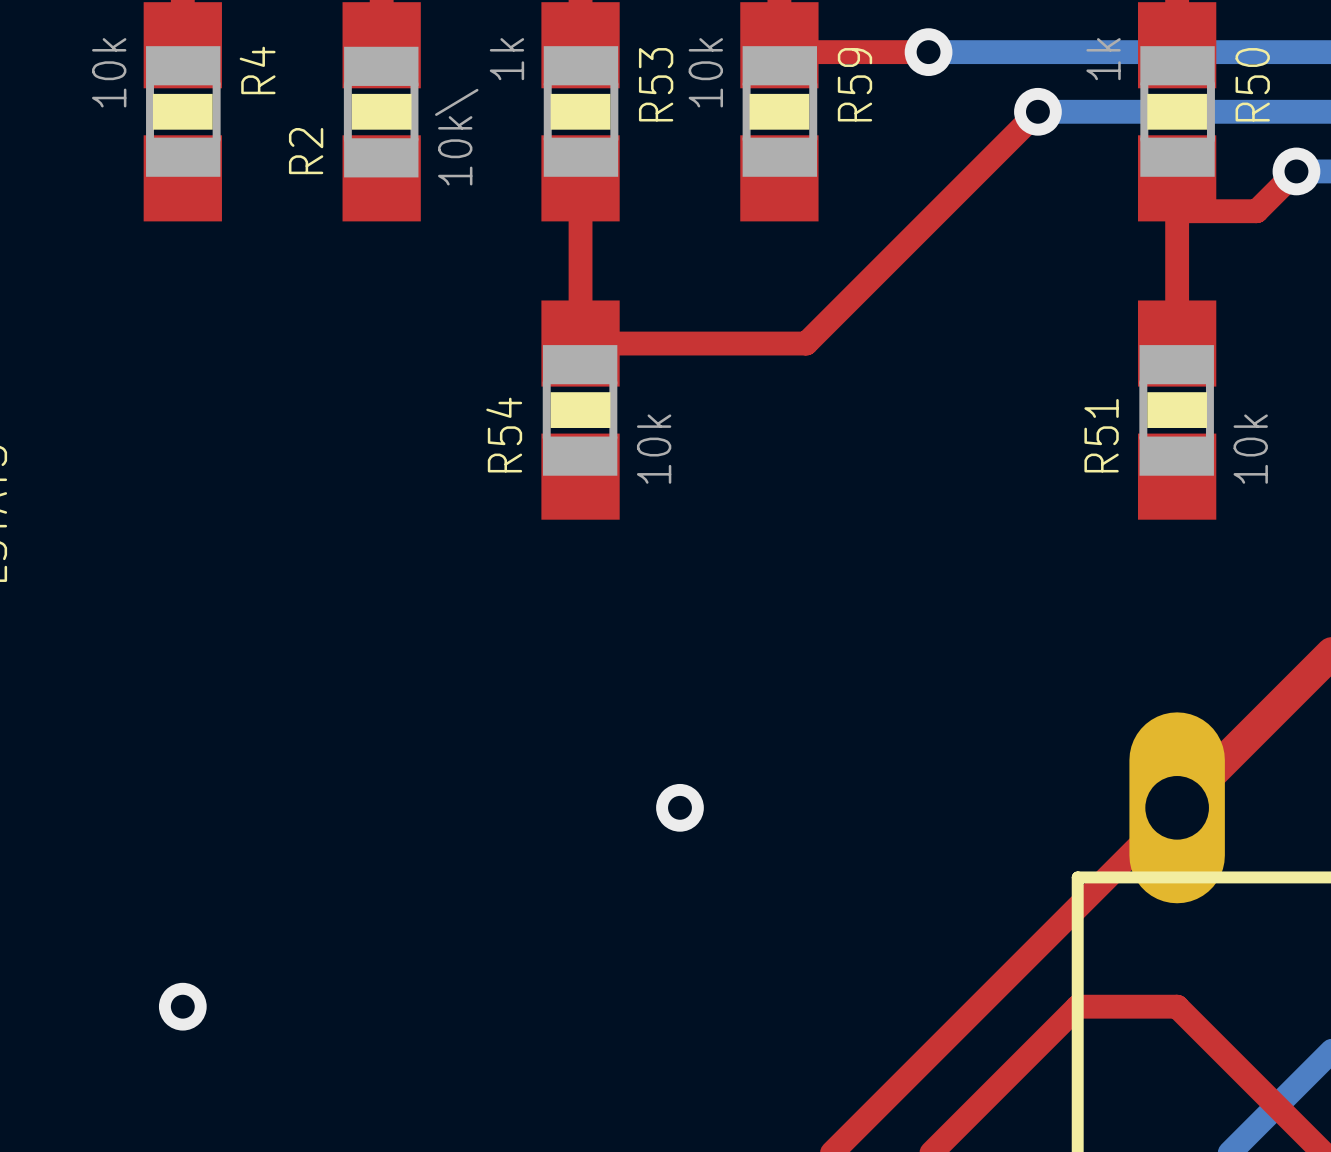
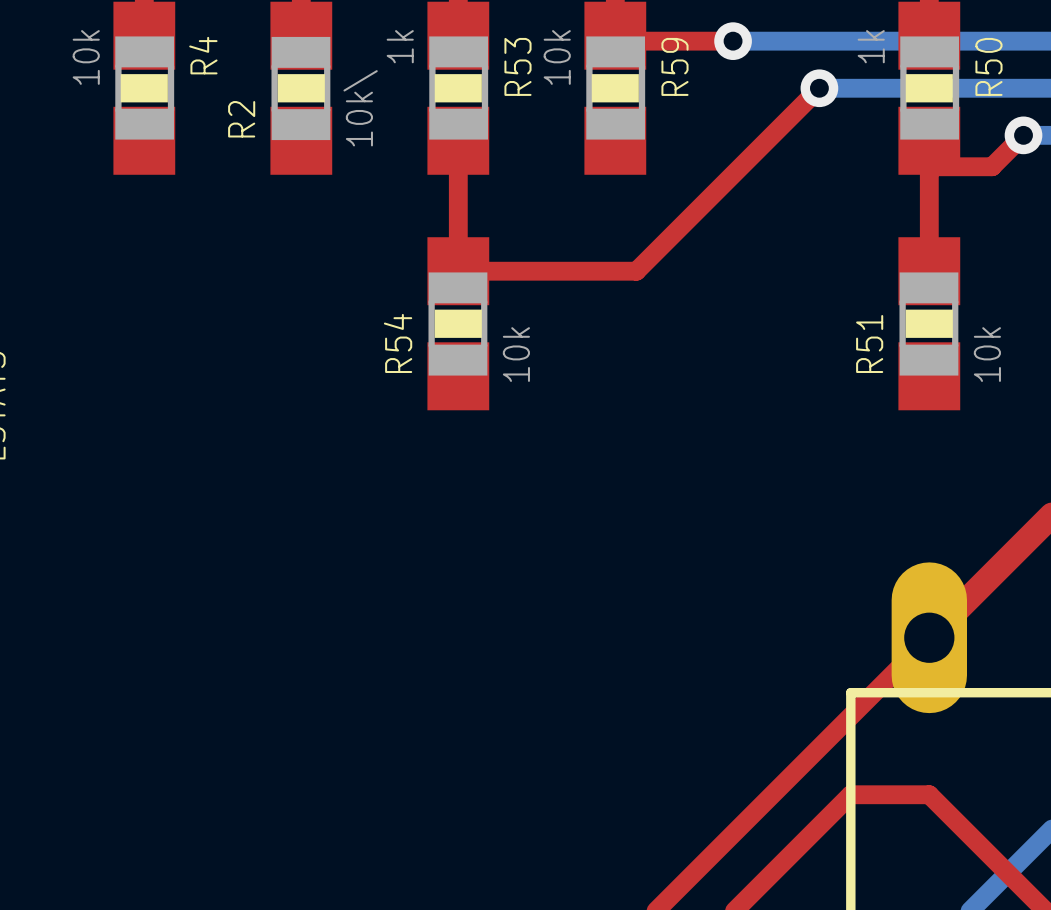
via: (679, 807) -> none
via: (182, 1006) -> none

